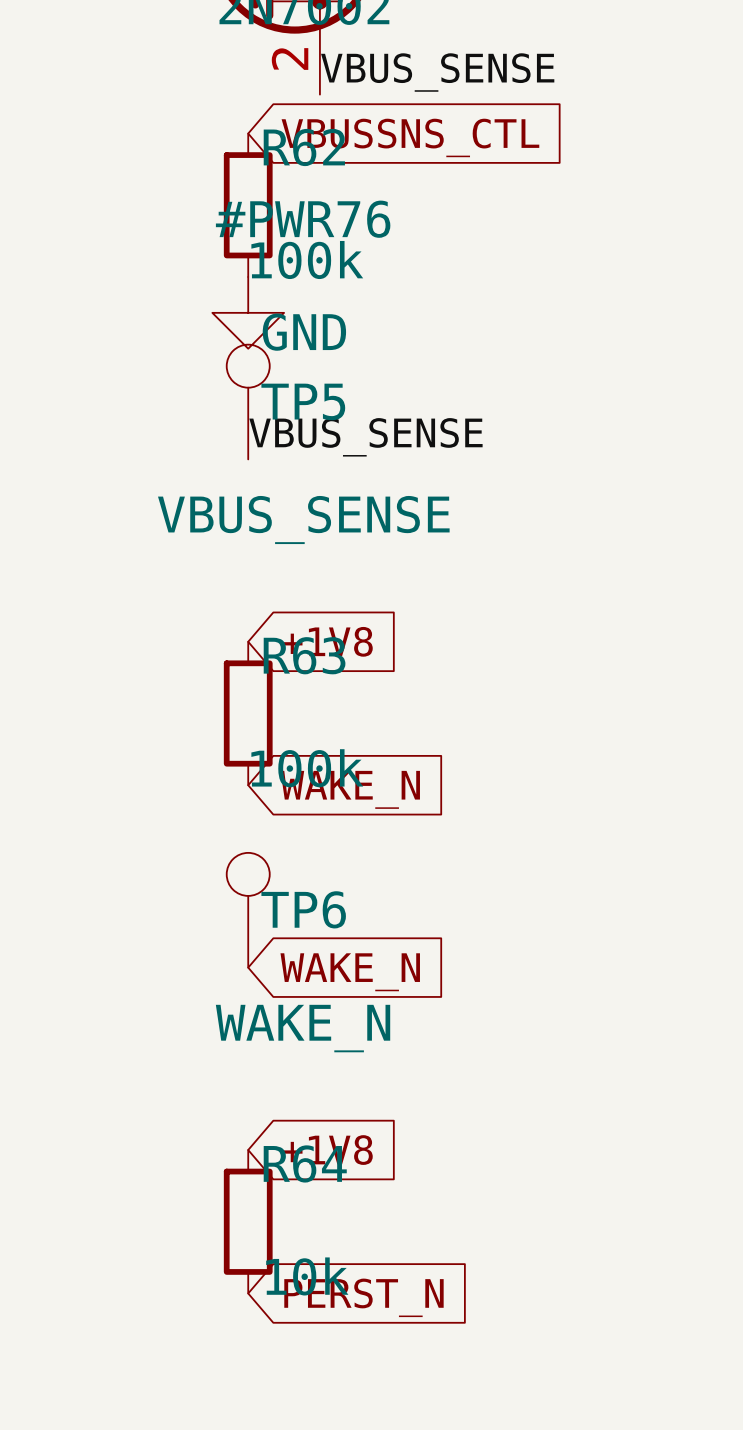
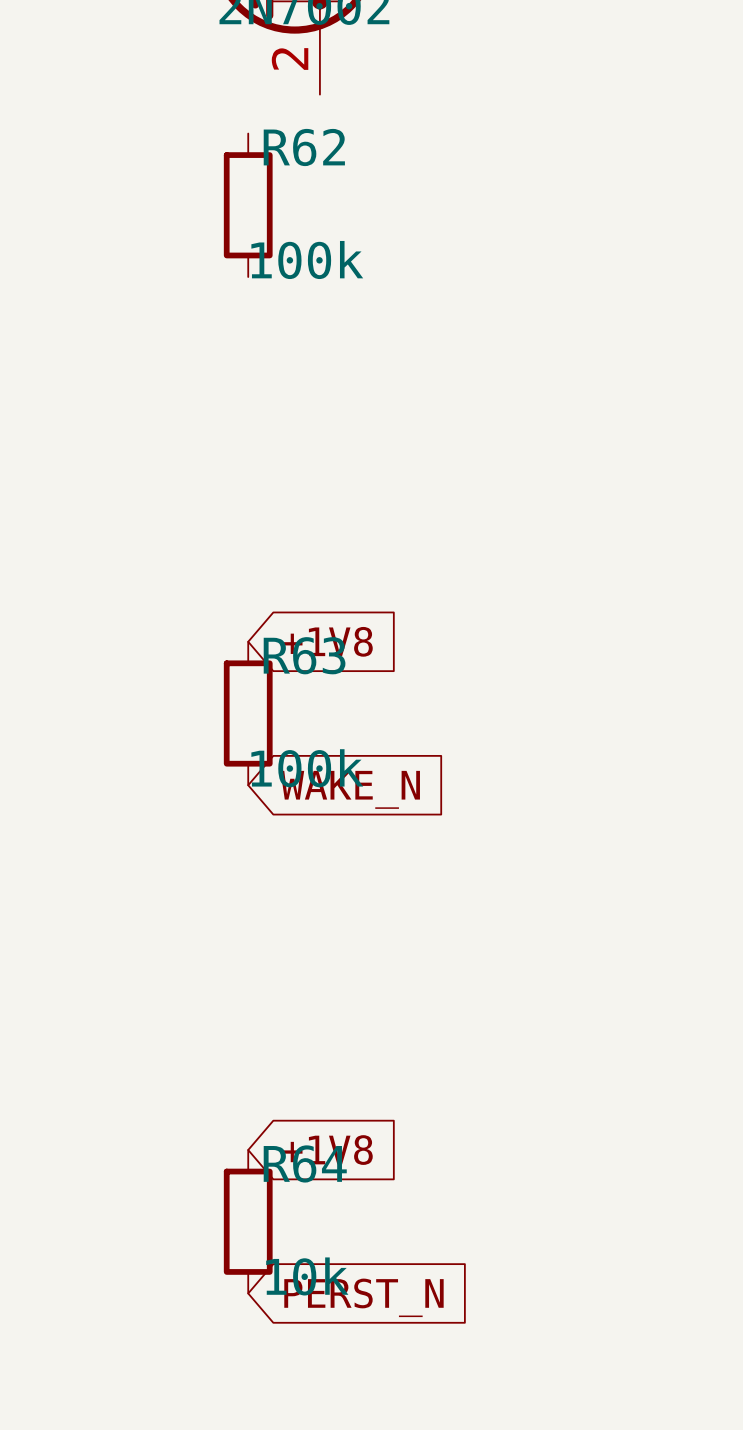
label: VBUS_SENSE (437, 72) -> none
global label: VBUSSNS_CTL (410, 137) -> none
#PWR76: GND (248, 312) -> none
TP5: VBUS_SENSE (248, 402) -> none
label: VBUS_SENSE (365, 437) -> none
TP6: WAKE_N (248, 910) -> none
global label: WAKE_N (350, 972) -> none

